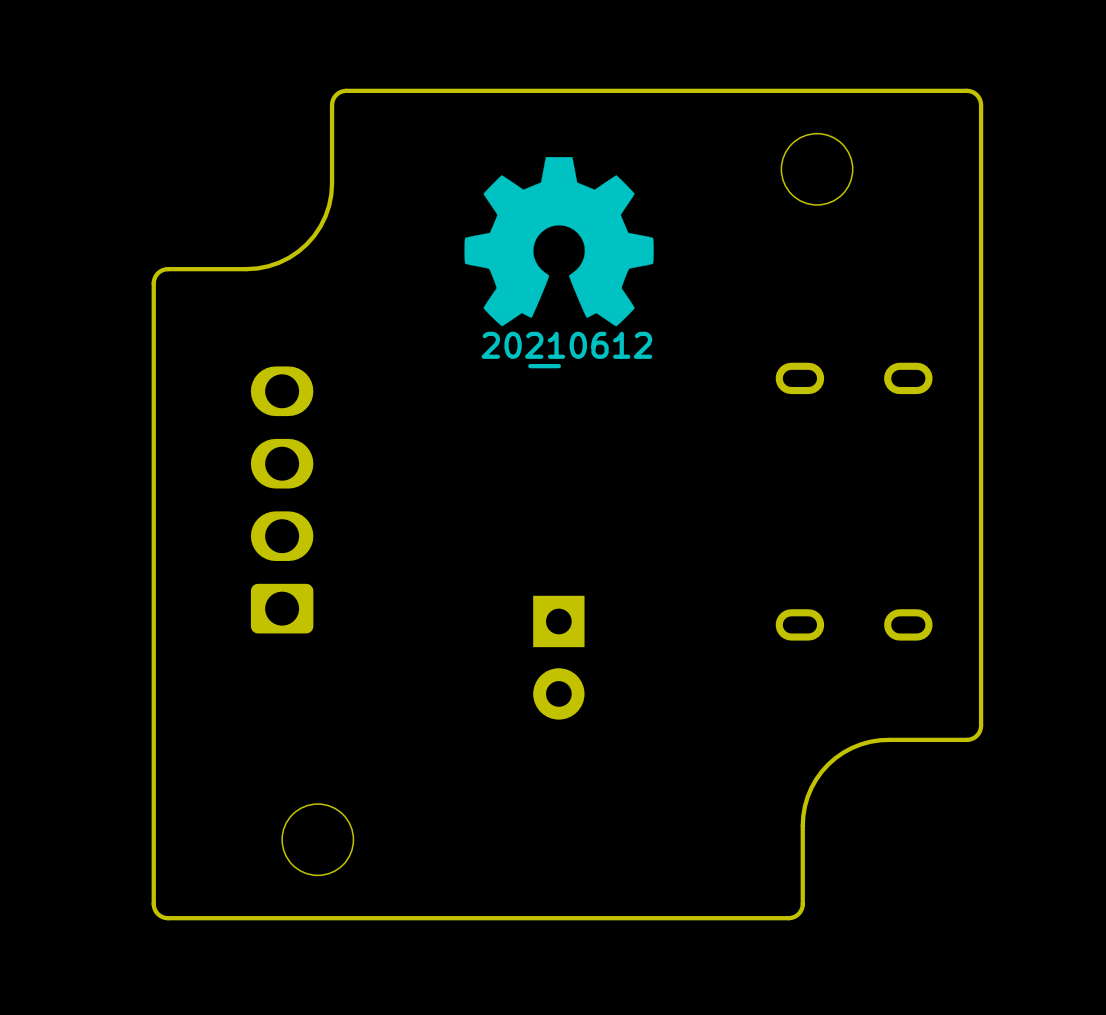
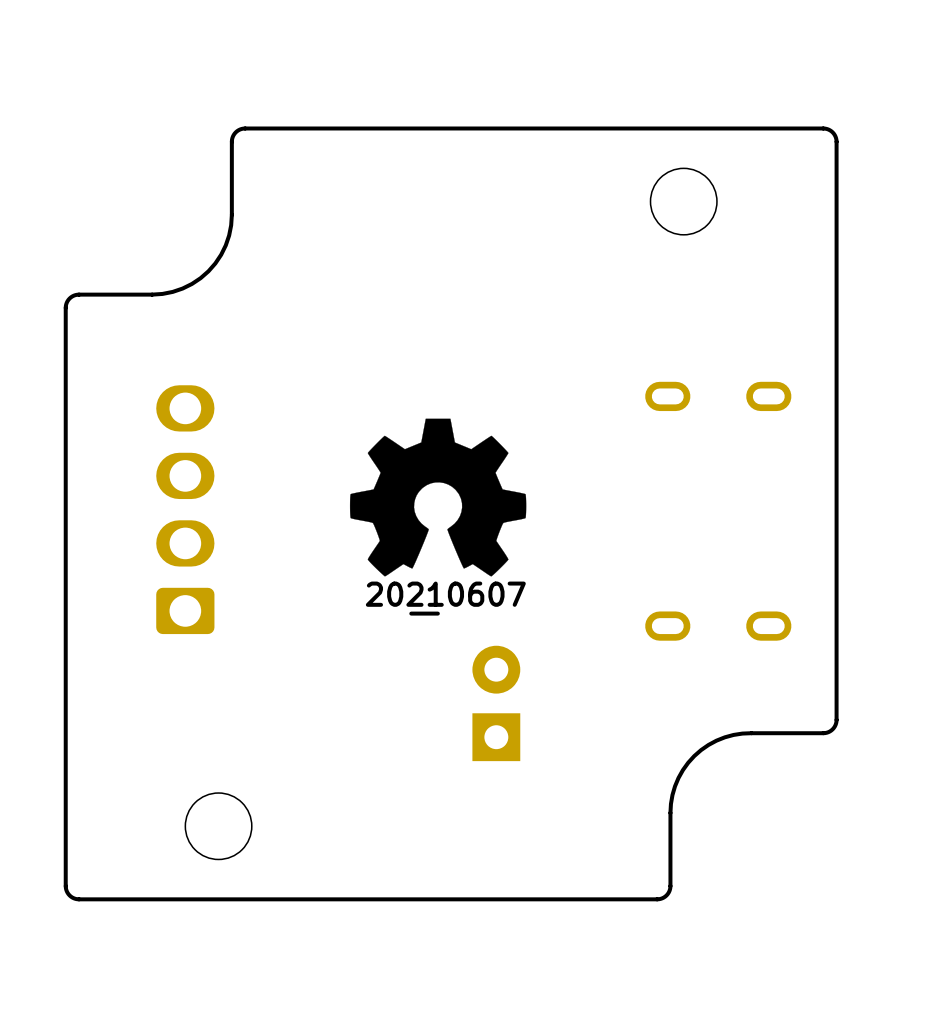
drawing position: (559, 241) -> (438, 497)
drawing: [528, 364, 562, 369] -> none
drawing: none -> [409, 611, 440, 616]
part rotation: 0° (558, 657) -> 180° (496, 703)
part position: (558, 657) -> (496, 703)

